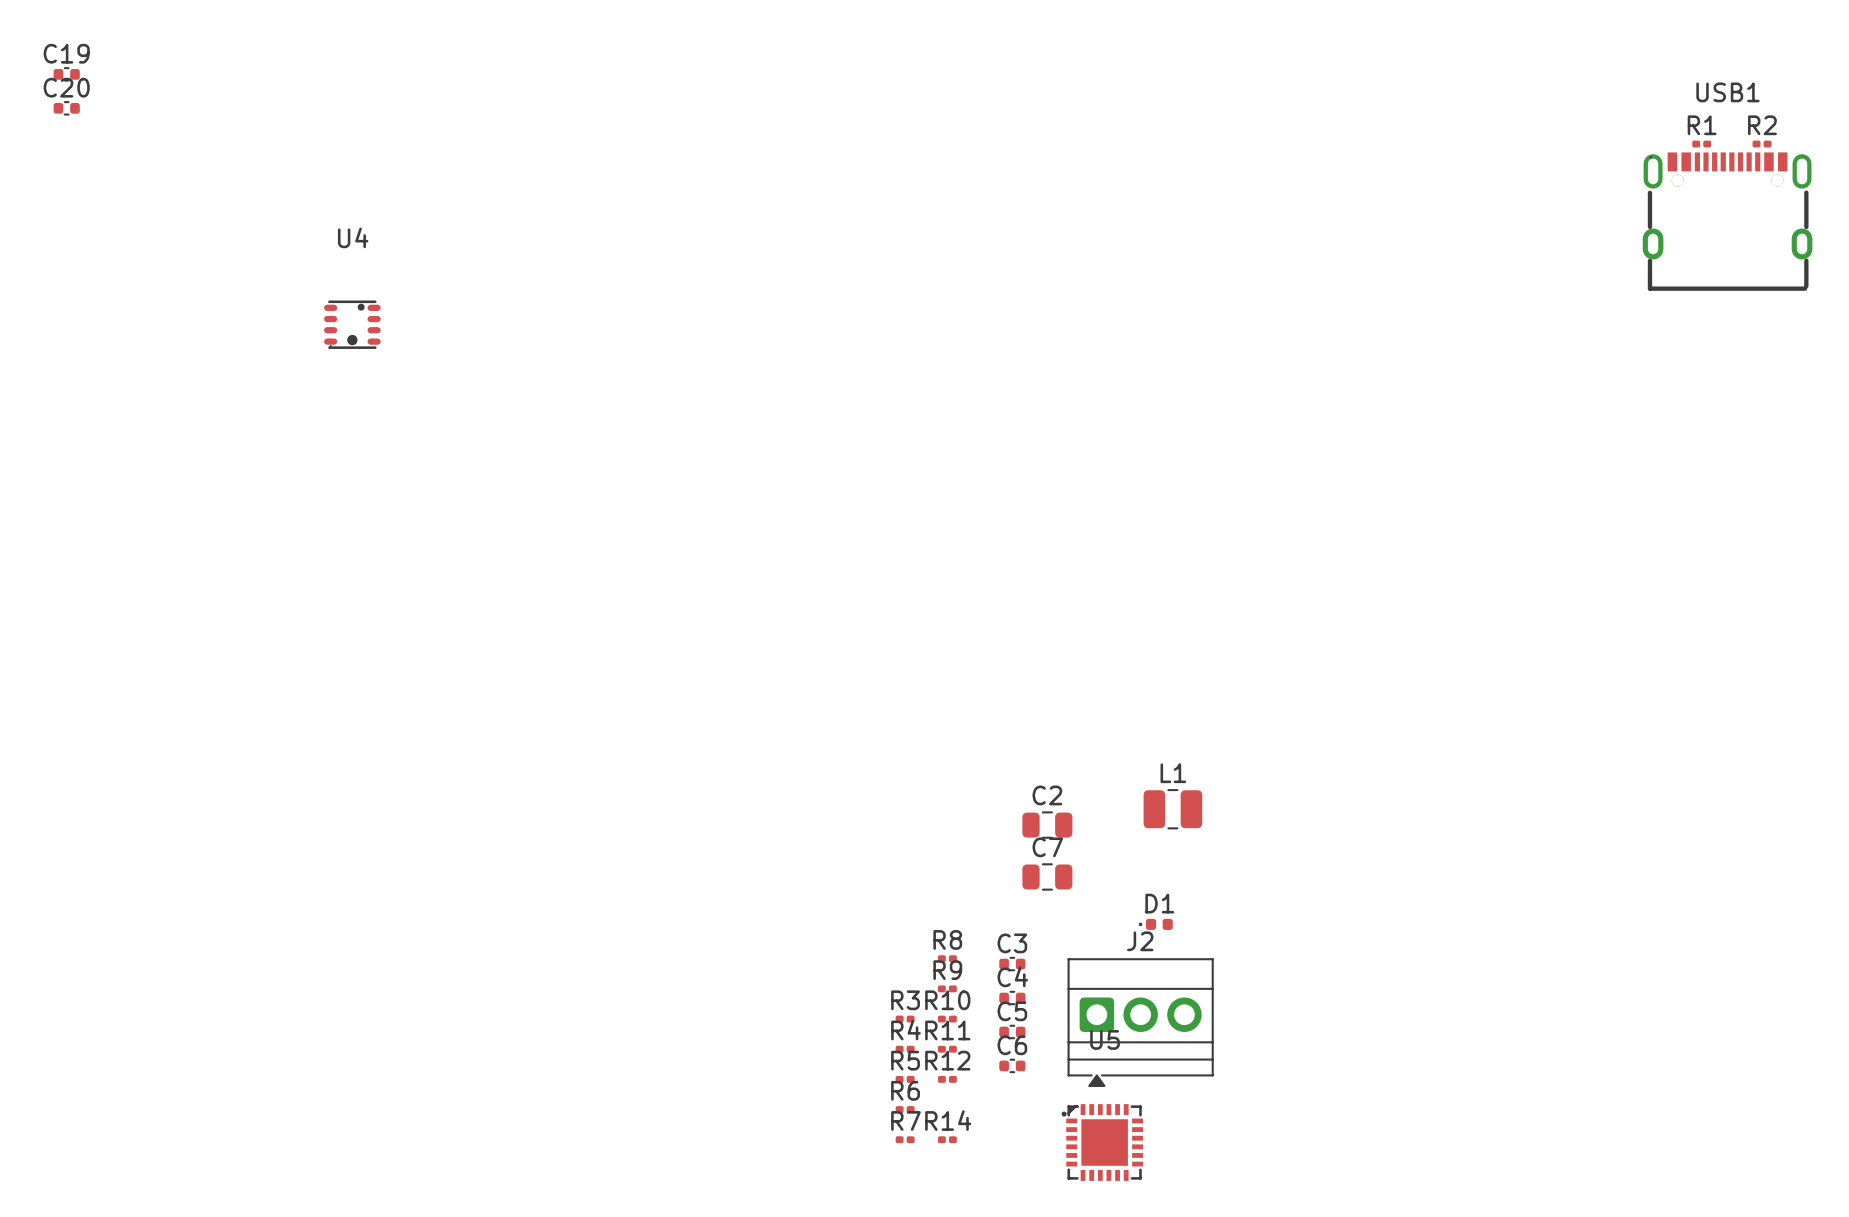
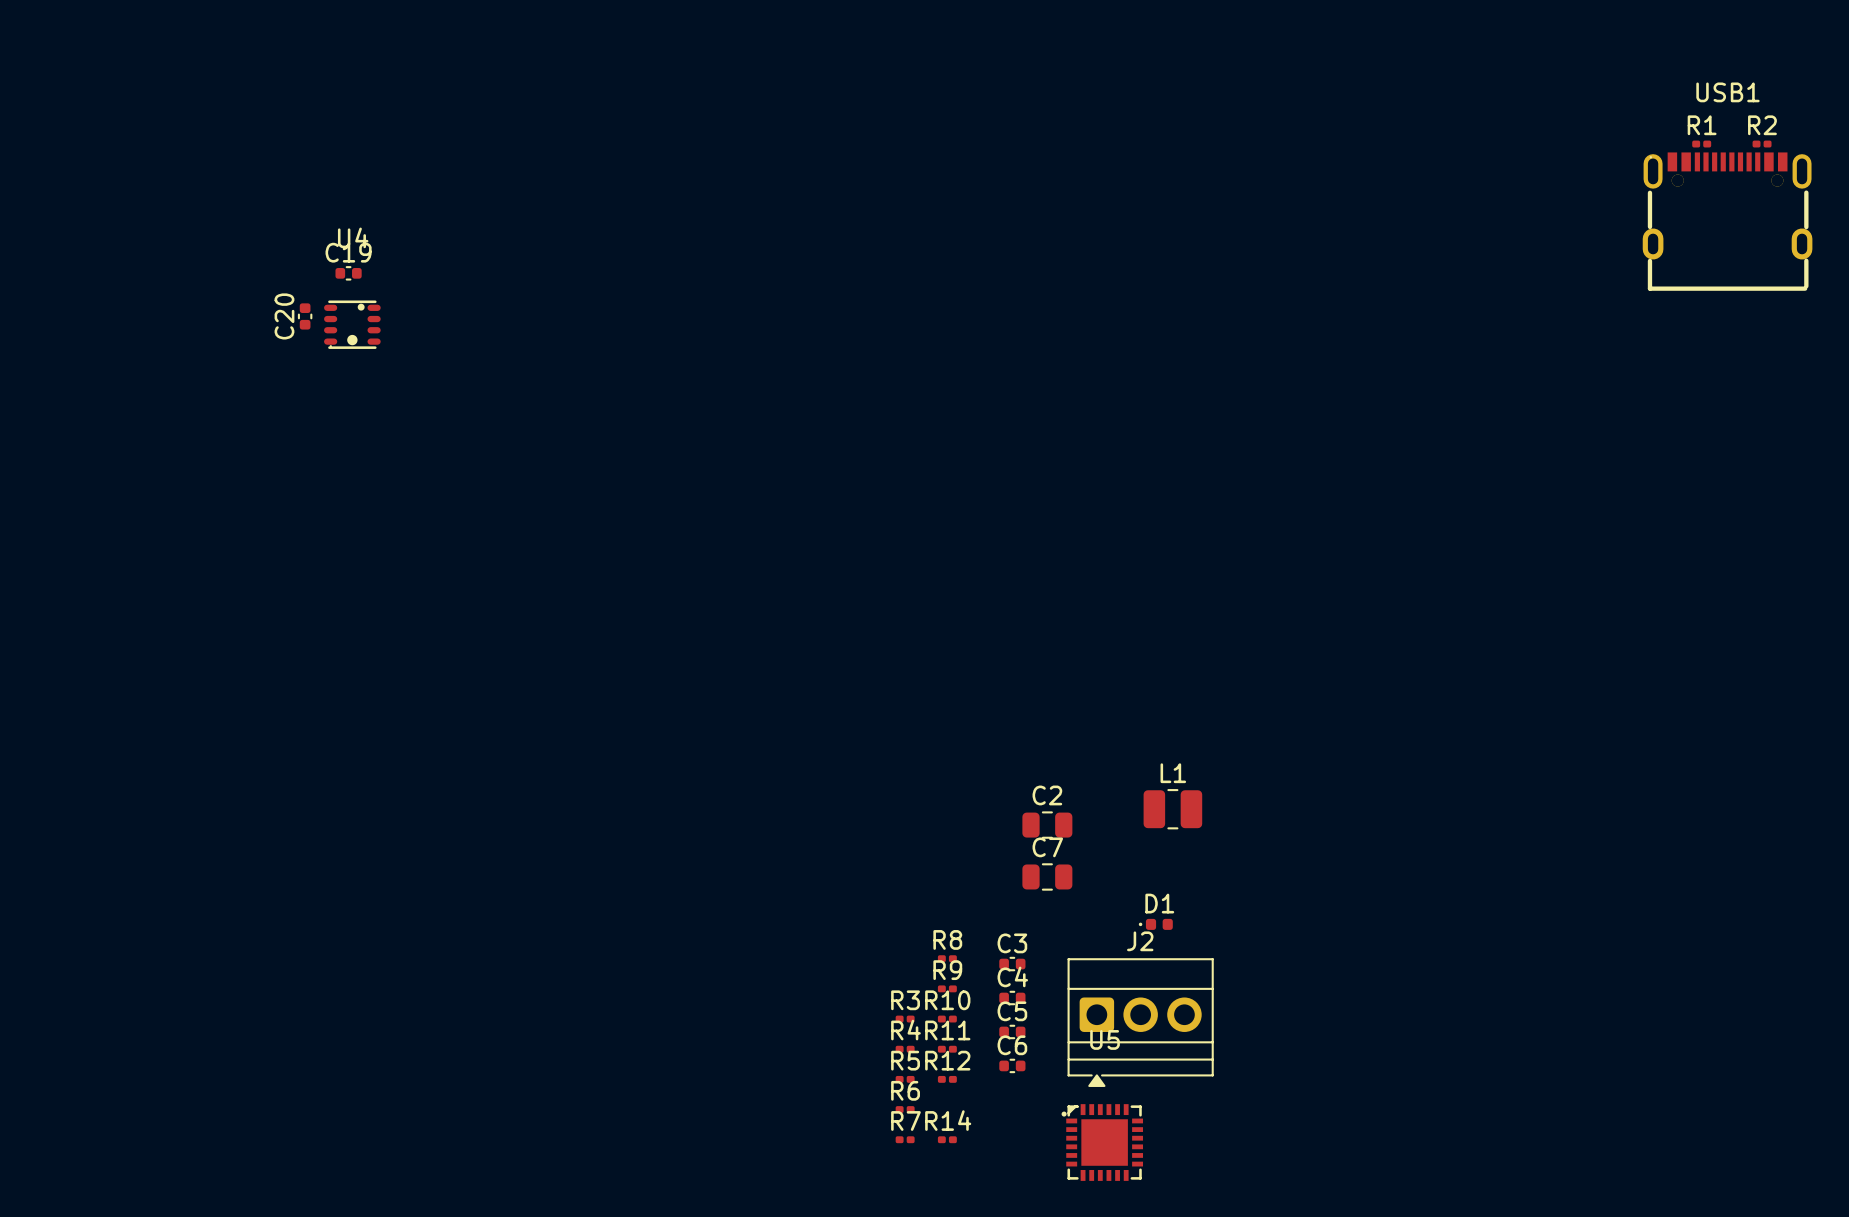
C19 position: (66, 74) -> (348, 273)
C20 rotation: 0° (66, 108) -> 90° clockwise (305, 316)
C20 position: (66, 108) -> (305, 316)

